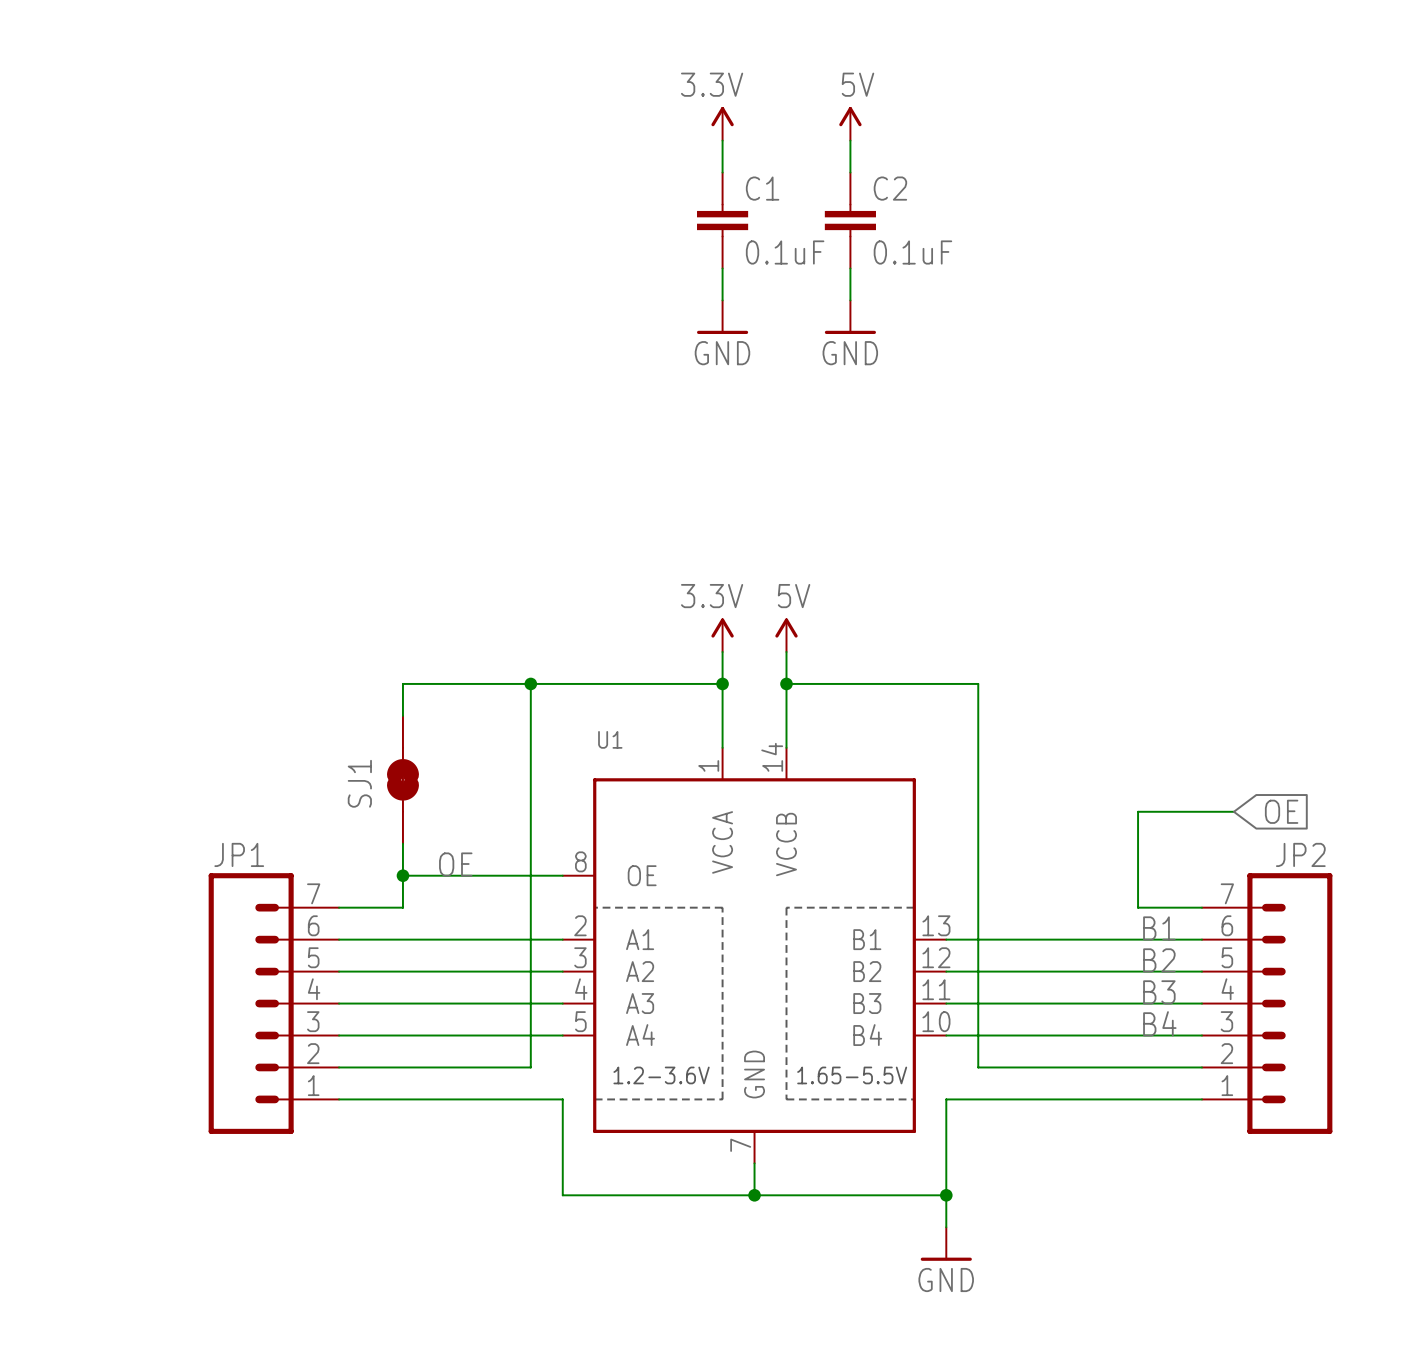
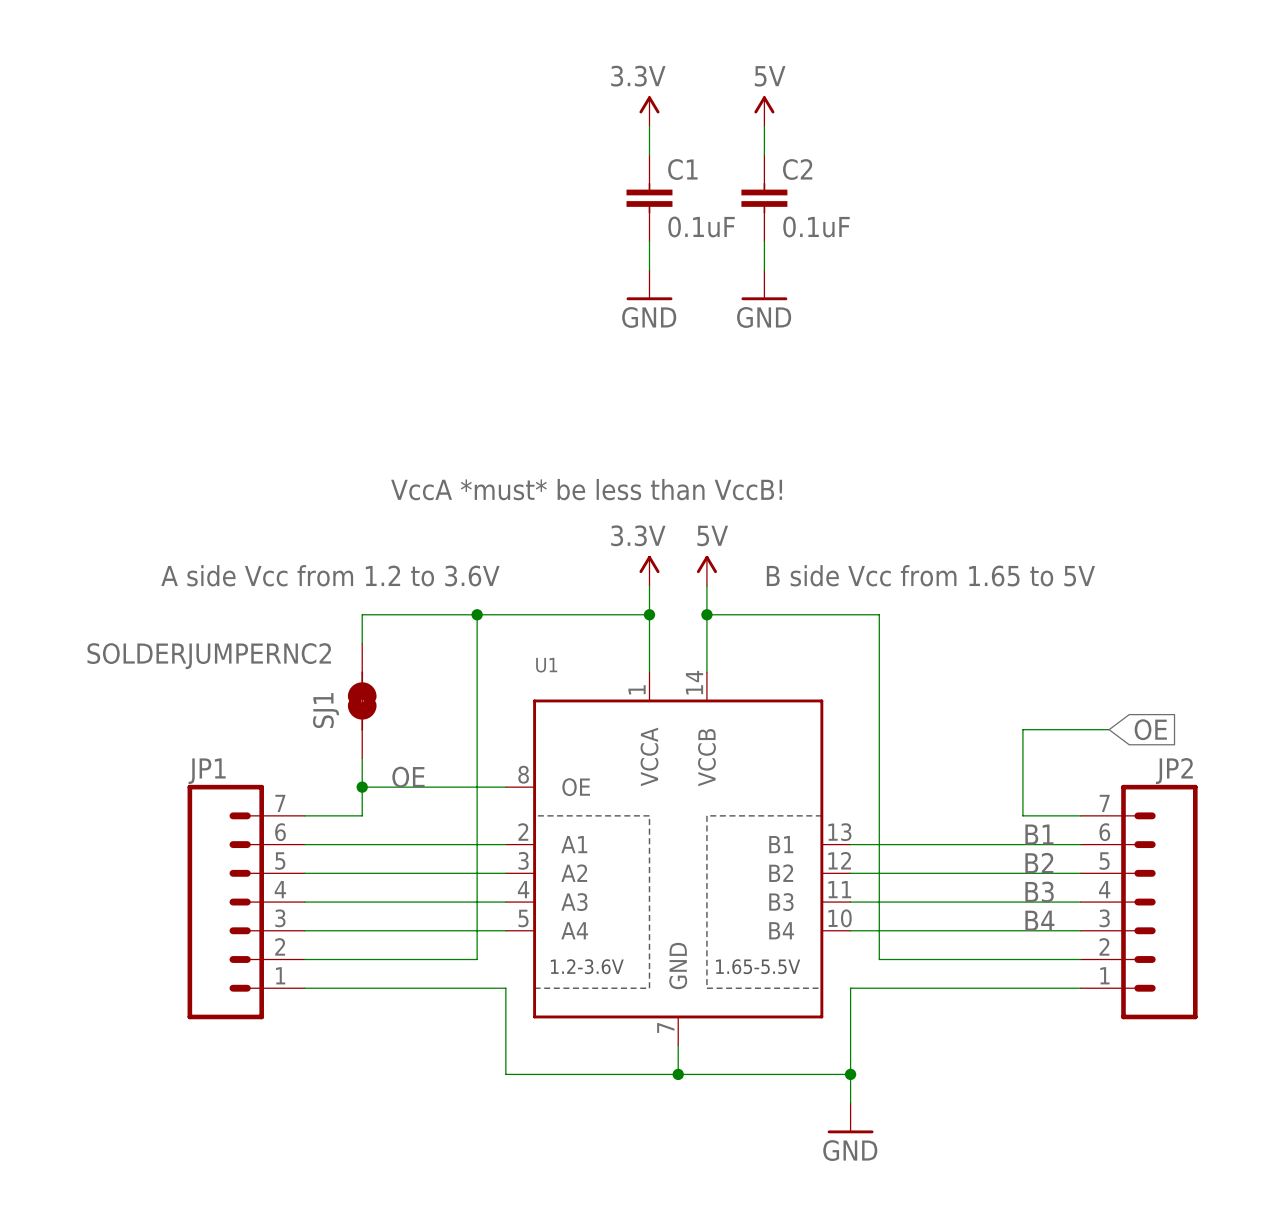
text: none -> VccA *must* be less than VccB! (586, 489)
text: none -> A side Vcc from 1.2 to 3.6V (330, 575)
text: none -> B side Vcc from 1.65 to 5V (930, 575)
SJ1 value: none -> SOLDERJUMPERNC2 (209, 656)

